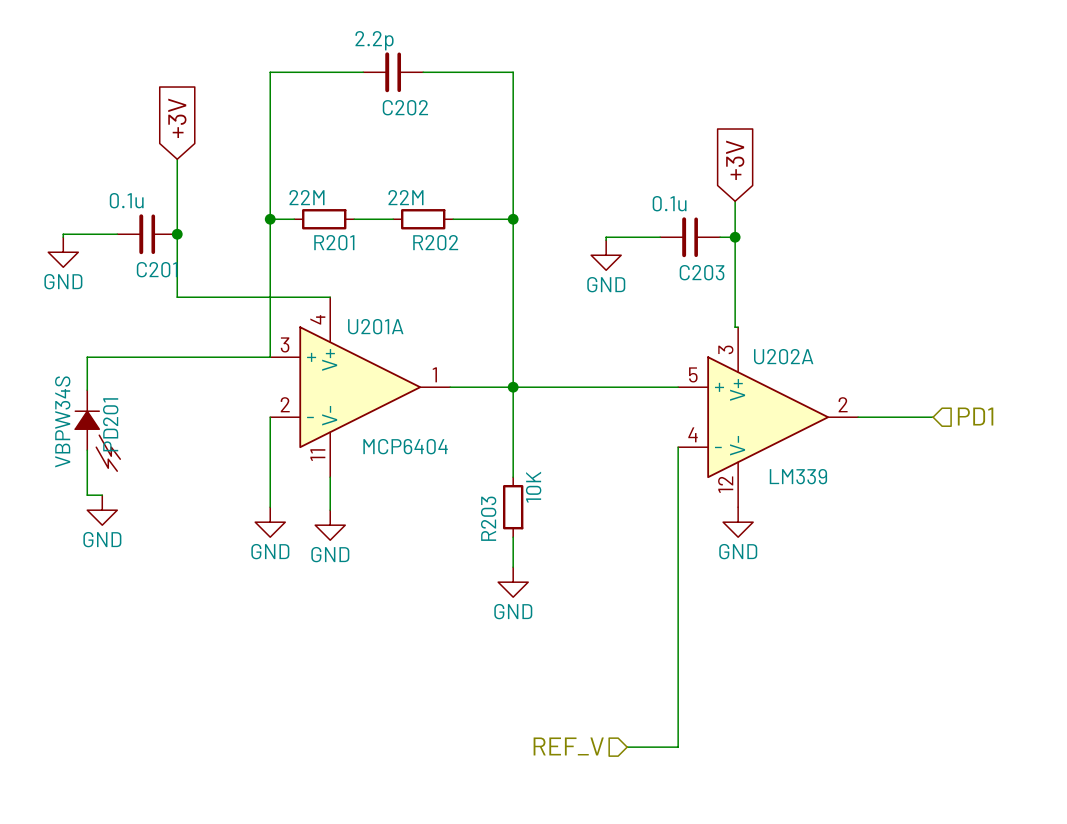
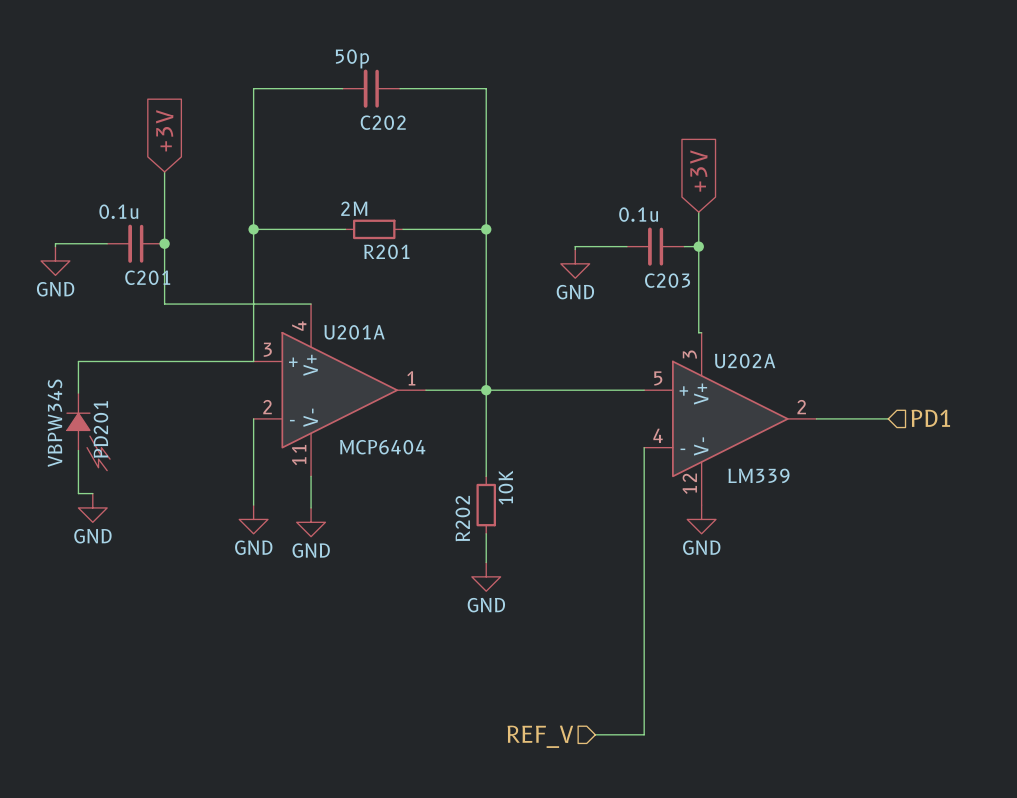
C202 value: 2.2p (374, 40) -> 50p (352, 58)
R201 value: 22M (306, 197) -> 2M (354, 208)
wire: none -> (276, 229) (334, 229)
R201 position: (324, 219) -> (374, 229)
wire: (366, 219) (393, 219) -> (402, 229) (428, 229)
R202: 22M (423, 219) -> none
R203 name: R203 (488, 518) -> R202 (462, 518)

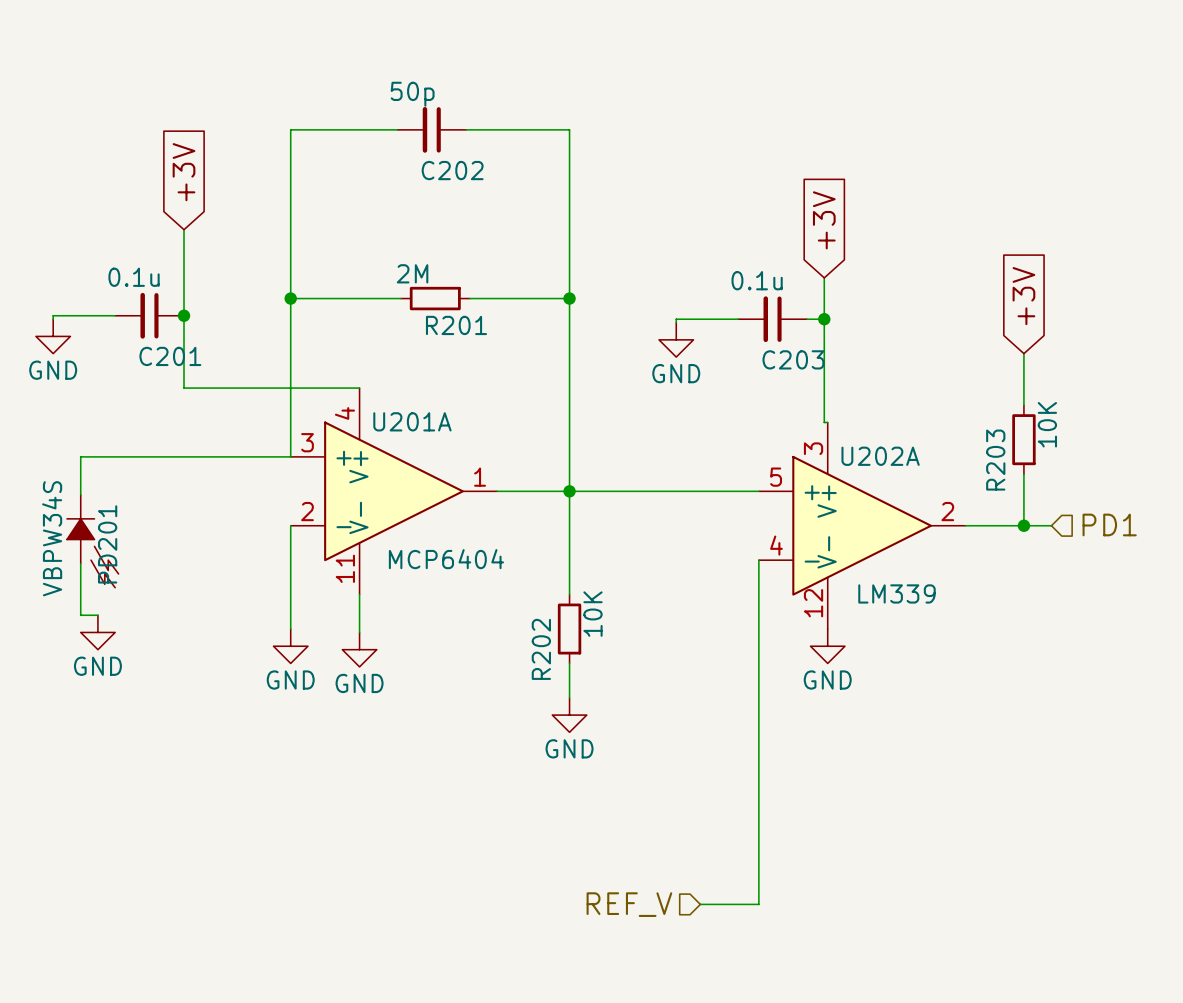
global label: none -> +3V (1023, 296)
wire: none -> (1023, 353) (1023, 405)
R203: none -> 10K (1023, 439)
wire: none -> (1023, 474) (1023, 525)
junction: none -> (1023, 525)

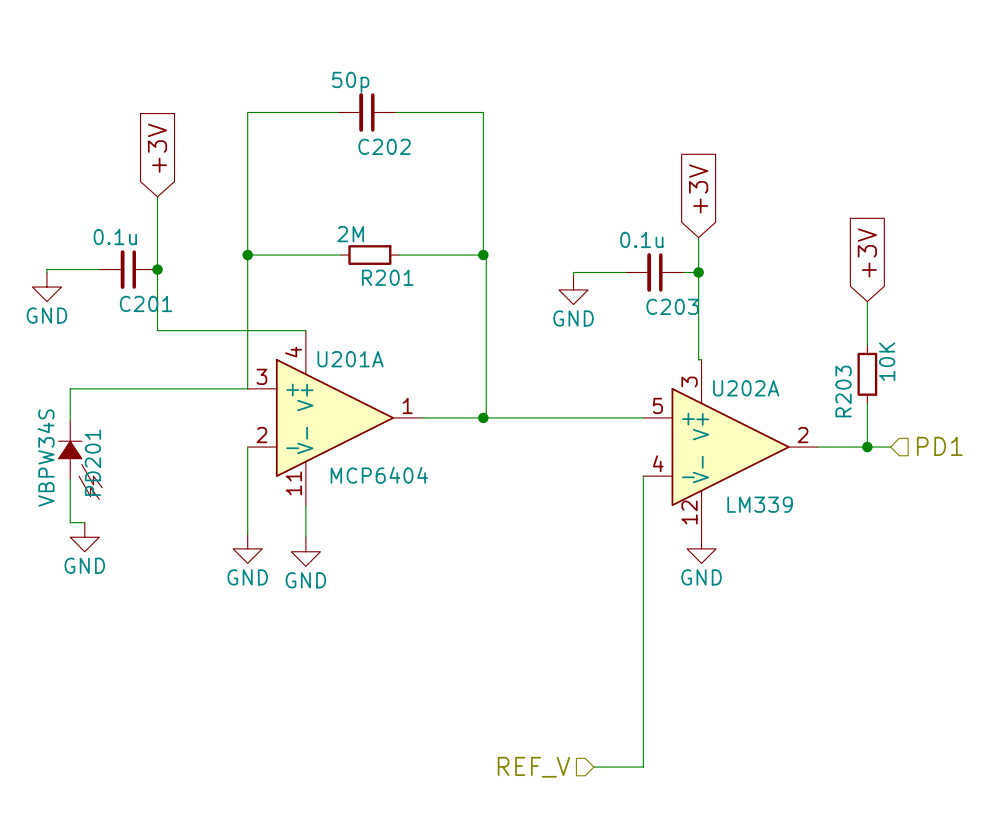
wire: (569, 298) (569, 594) -> (483, 255) (486, 255) (486, 417)
R202: 10K (569, 629) -> none
wire: (569, 663) (569, 697) -> none
power symbol: GND (569, 715) -> none

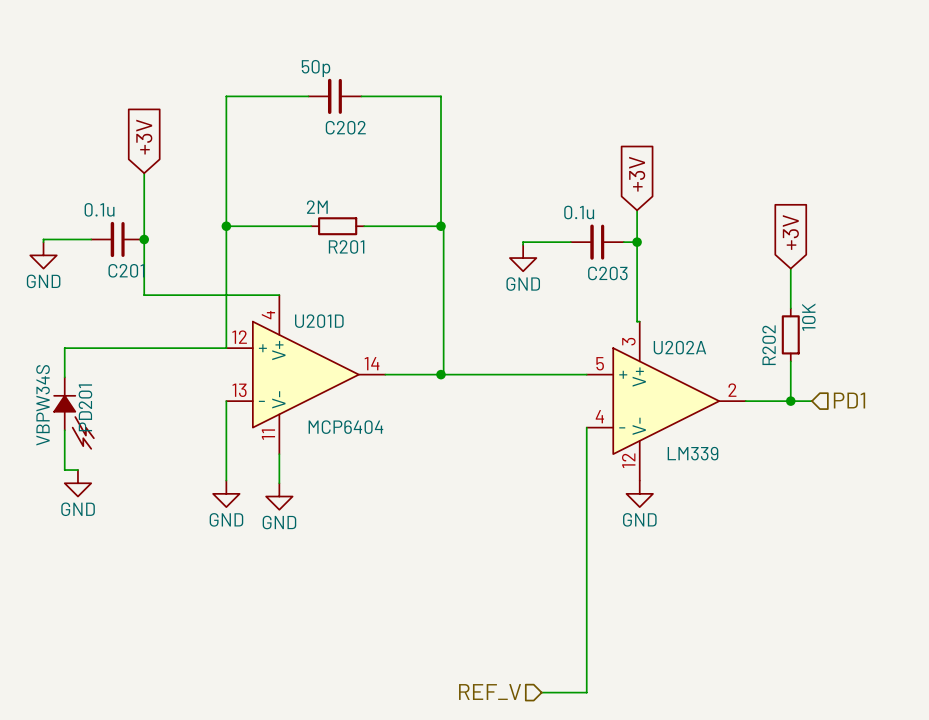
U201A name: U201A (350, 359) -> U201D (319, 321)
U201A pin number: 3 (261, 376) -> 12 (239, 337)
R203 name: R203 (843, 391) -> R202 (769, 345)
U201A pin number: 1 (407, 405) -> 14 (372, 363)
U201A pin number: 2 (261, 435) -> 13 (239, 390)

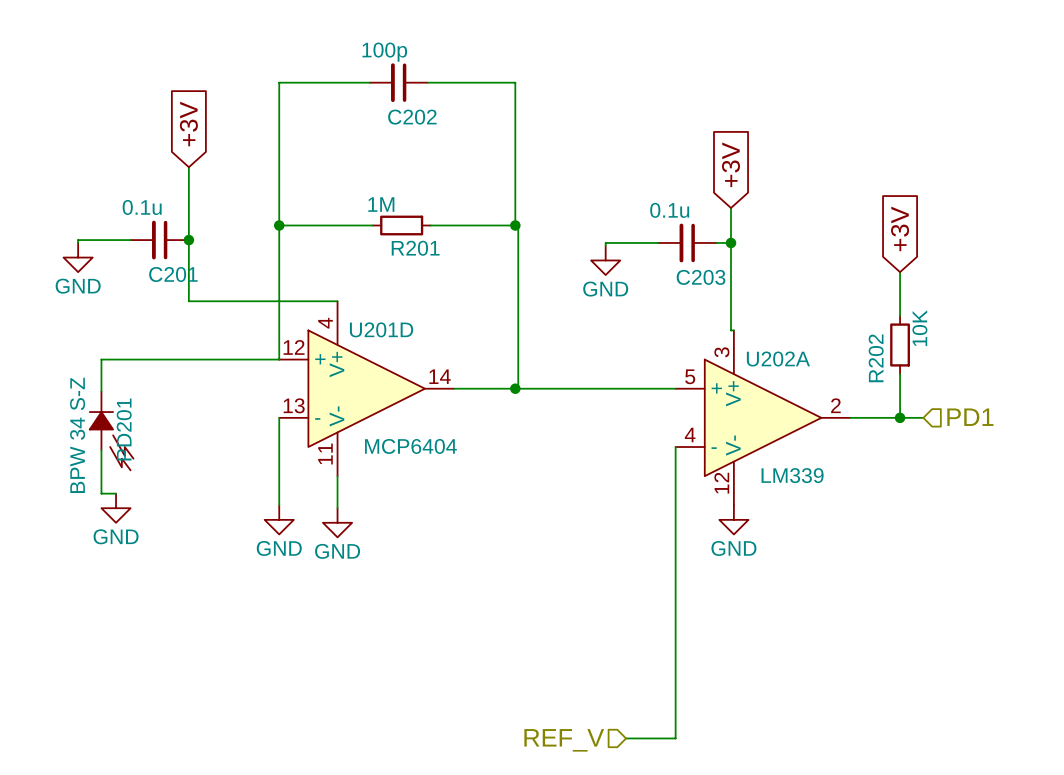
C202 value: 50p (316, 68) -> 100p (384, 52)
R201 value: 2M (317, 207) -> 1M (381, 204)
PD201 value: VBPW34S (43, 405) -> BPW 34 S-Z (77, 435)

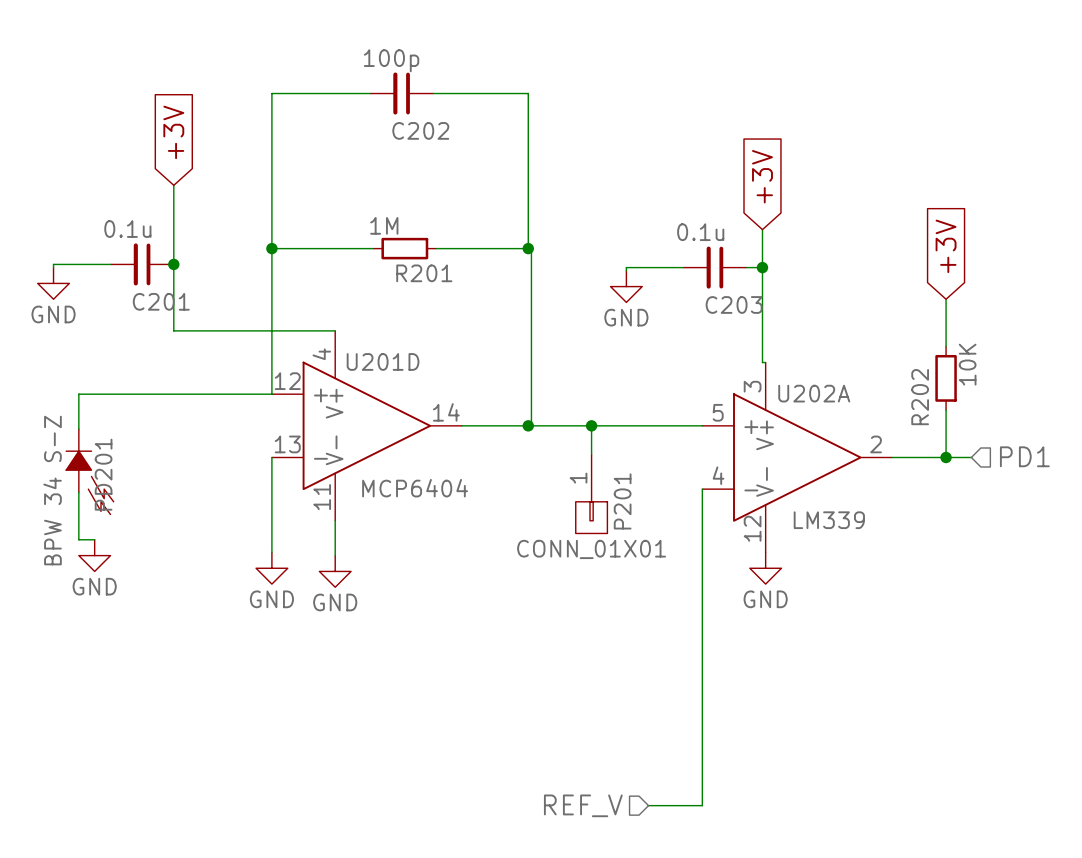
wire: none -> (591, 425) (591, 454)
junction: none -> (591, 425)
P201: none -> CONN_01X01 (591, 493)

